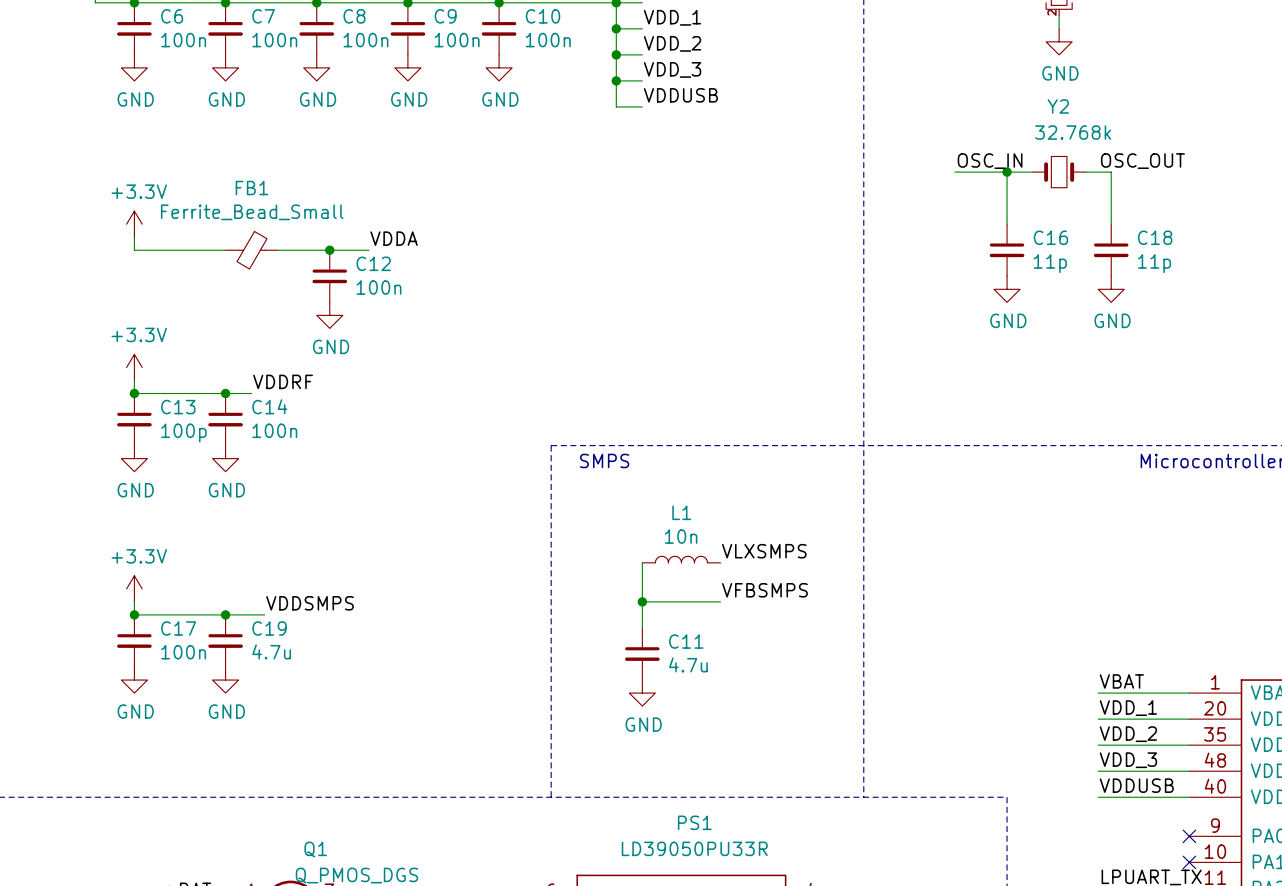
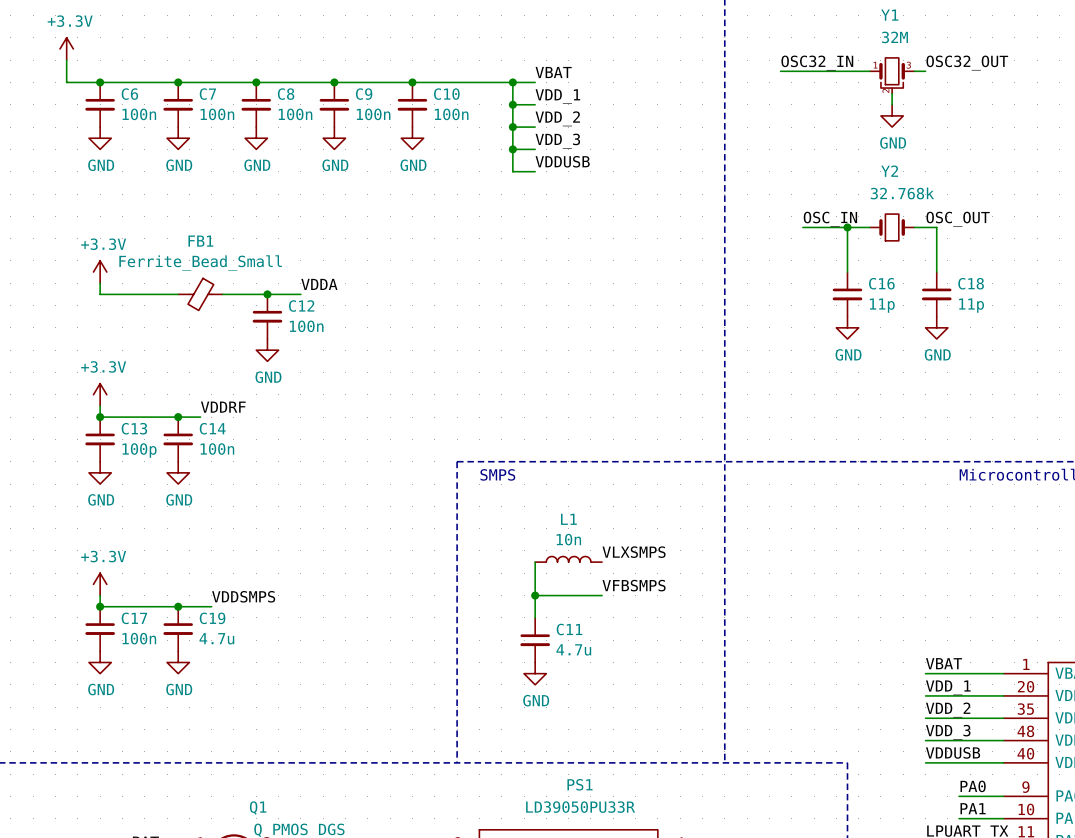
label: none -> PA0 (973, 786)
wire: none -> (959, 796) (1003, 796)
no-connect mark: (1189, 836) -> none
label: none -> PA1 (973, 808)
wire: none -> (959, 818) (1003, 818)
no-connect mark: (1189, 862) -> none

